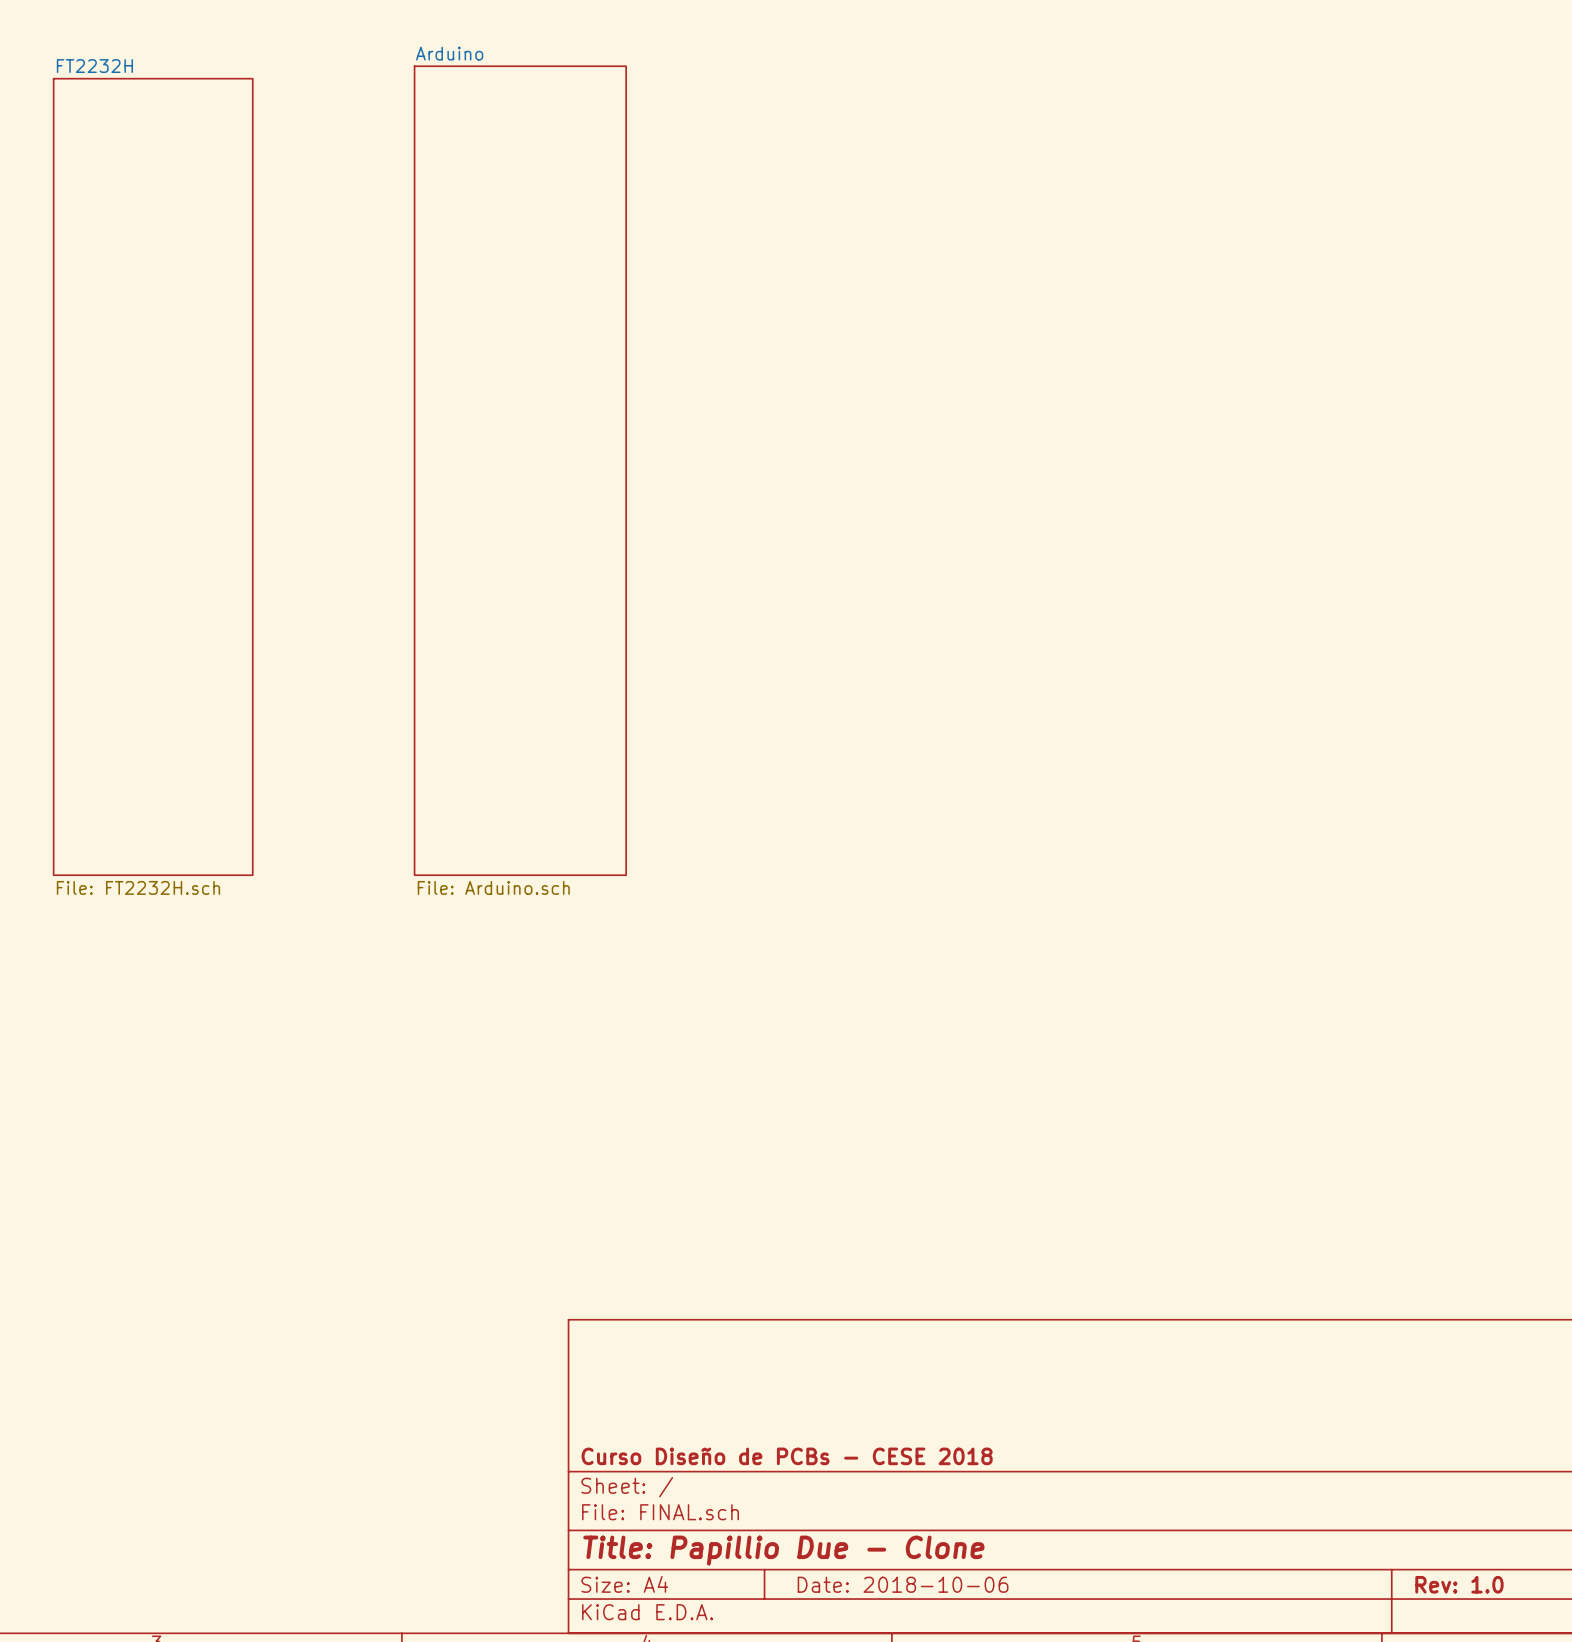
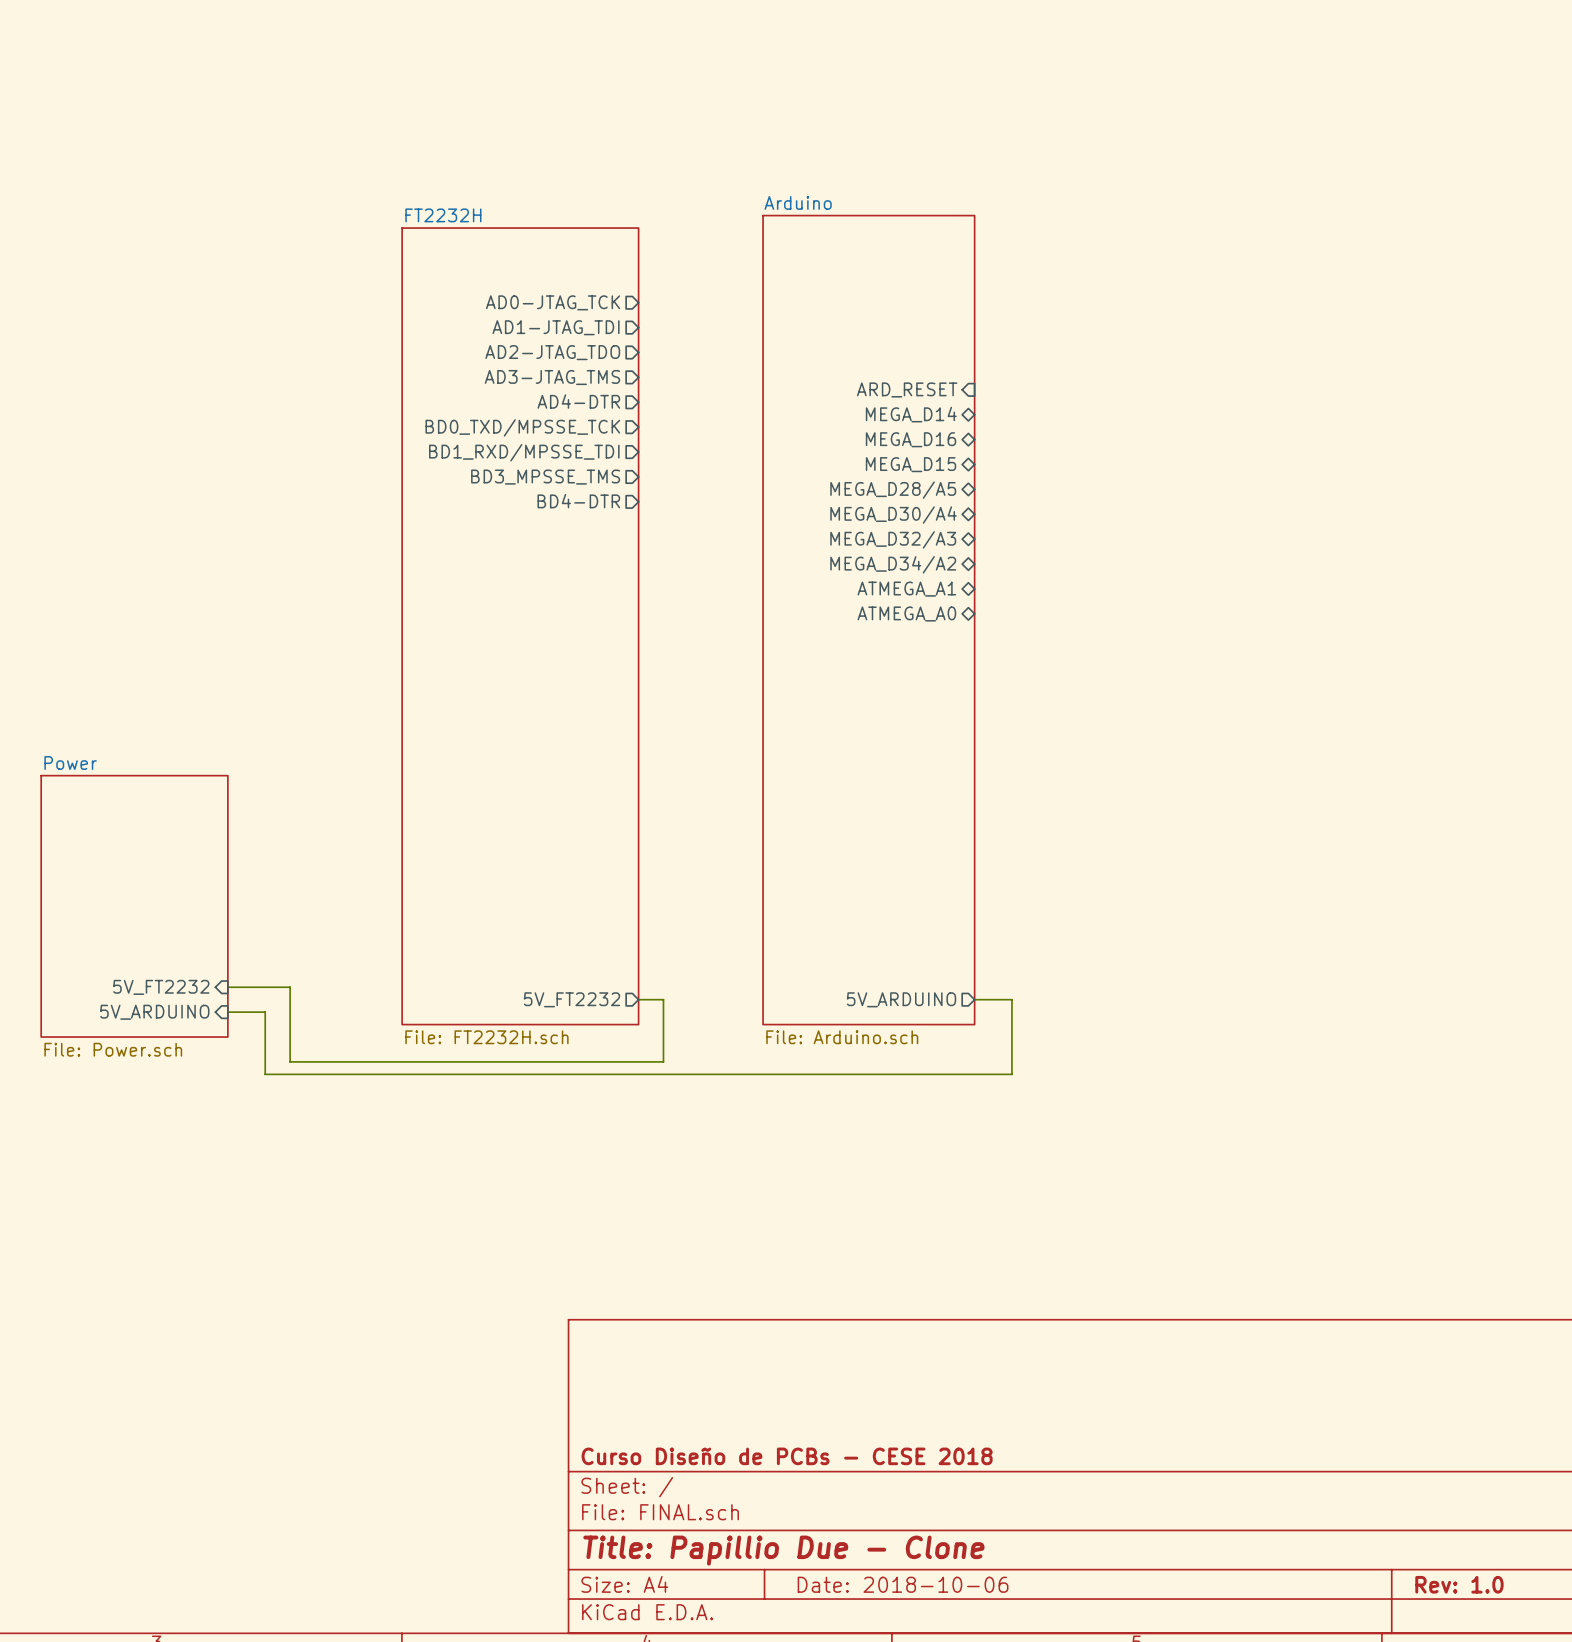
sheet FT2232H shape: [53, 78, 253, 876] -> [402, 228, 639, 1025]
sheet pin: none -> AD0-JTAG_TCK (553, 302)
sheet pin: none -> AD1-JTAG_TDI (556, 327)
sheet pin: none -> AD2-JTAG_TDO (552, 352)
sheet pin: none -> AD3-JTAG_TMS (552, 377)
sheet pin: none -> ARD_RESET (907, 389)
sheet pin: none -> AD4-DTR (578, 401)
sheet pin: none -> MEGA_D14 (911, 414)
sheet pin: none -> BD0_TXD/MPSSE_TCK (522, 427)
sheet pin: none -> MEGA_D16 (911, 439)
sheet pin: none -> BD1_RXD/MPSSE_TDI (524, 452)
sheet pin: none -> MEGA_D15 (911, 464)
sheet Arduino: File: Arduino.sch (520, 470) -> none
sheet pin: none -> BD3_MPSSE_TMS (545, 477)
sheet pin: none -> MEGA_D28/A5 (893, 490)
sheet pin: none -> BD4-DTR (578, 501)
sheet pin: none -> MEGA_D30/A4 (893, 515)
sheet pin: none -> MEGA_D32/A3 (893, 539)
sheet pin: none -> MEGA_D34/A2 (893, 564)
sheet pin: none -> ATMEGA_A1 (906, 589)
sheet pin: none -> ATMEGA_A0 (906, 613)
sheet Arduino: none -> File: Arduino.sch (868, 620)
sheet Power: none -> File: Power.sch (134, 906)
sheet pin: none -> 5V_FT2232 (161, 987)
wire: none -> (227, 987) (290, 987) (290, 1061) (663, 1061) (663, 999) (638, 999)
sheet pin: none -> 5V_FT2232 (572, 999)
sheet pin: none -> 5V_ARDUINO (901, 999)
wire: none -> (974, 999) (1011, 999) (1011, 1074) (265, 1074) (265, 1012) (227, 1012)
sheet pin: none -> 5V_ARDUINO (154, 1012)

